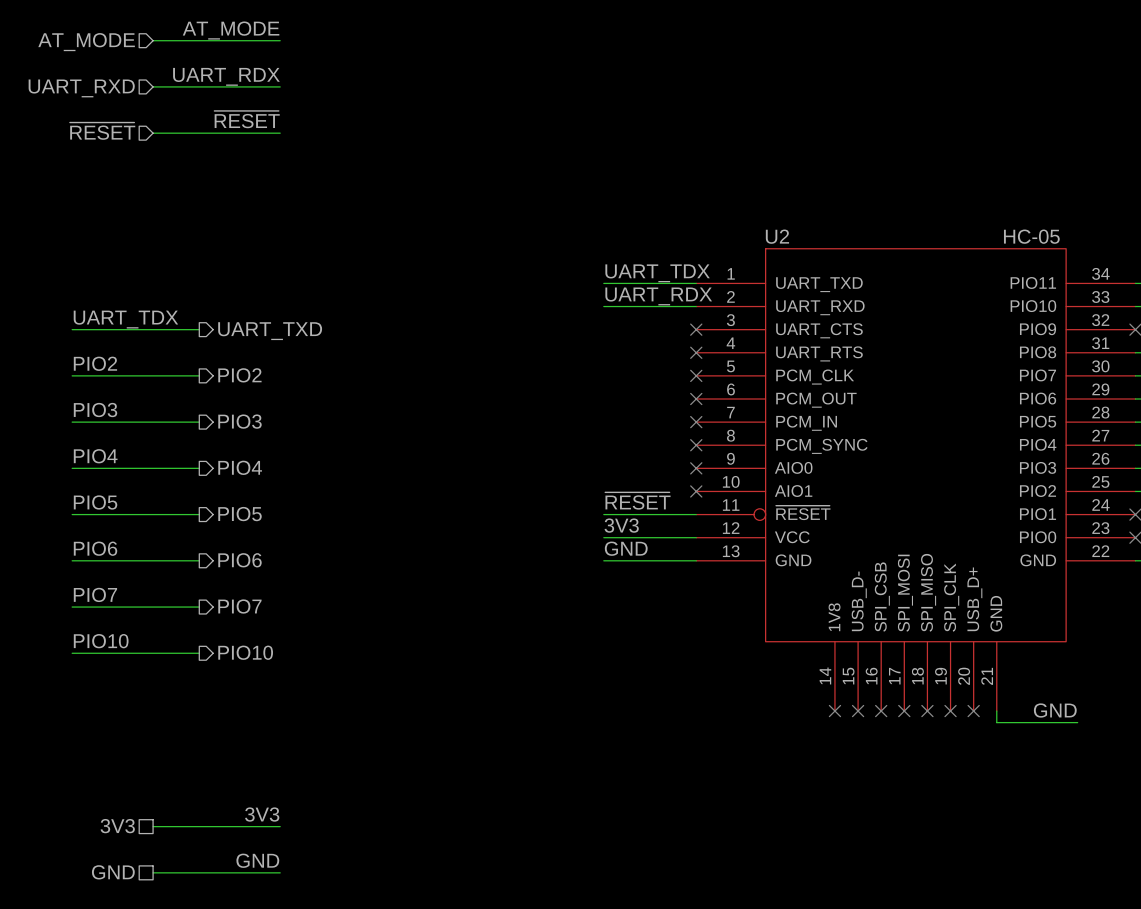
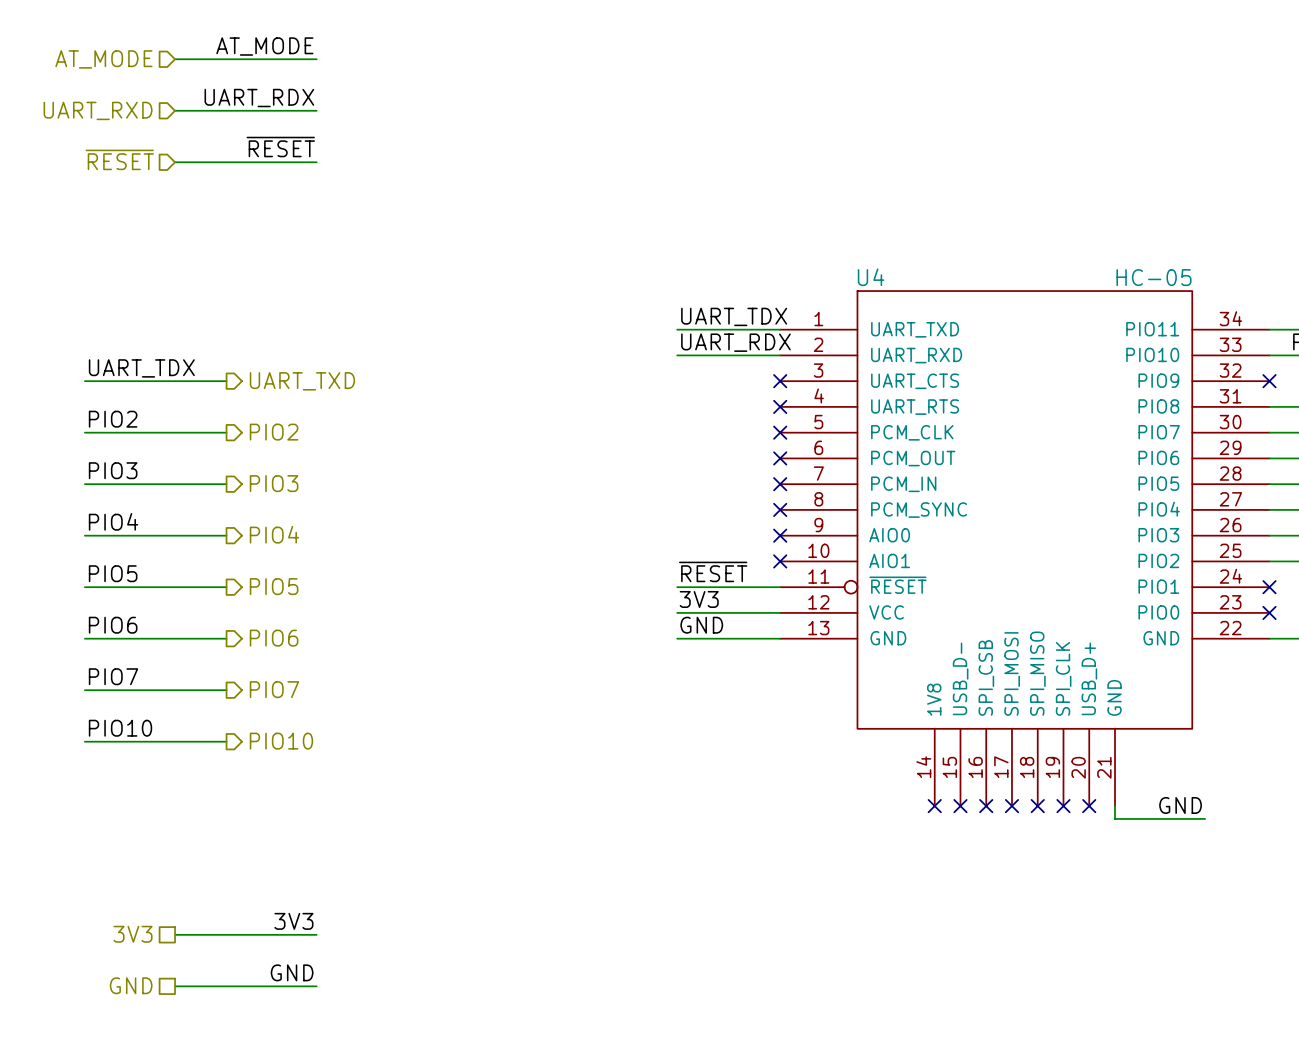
U2 name: U2 (777, 236) -> U4 (871, 277)

